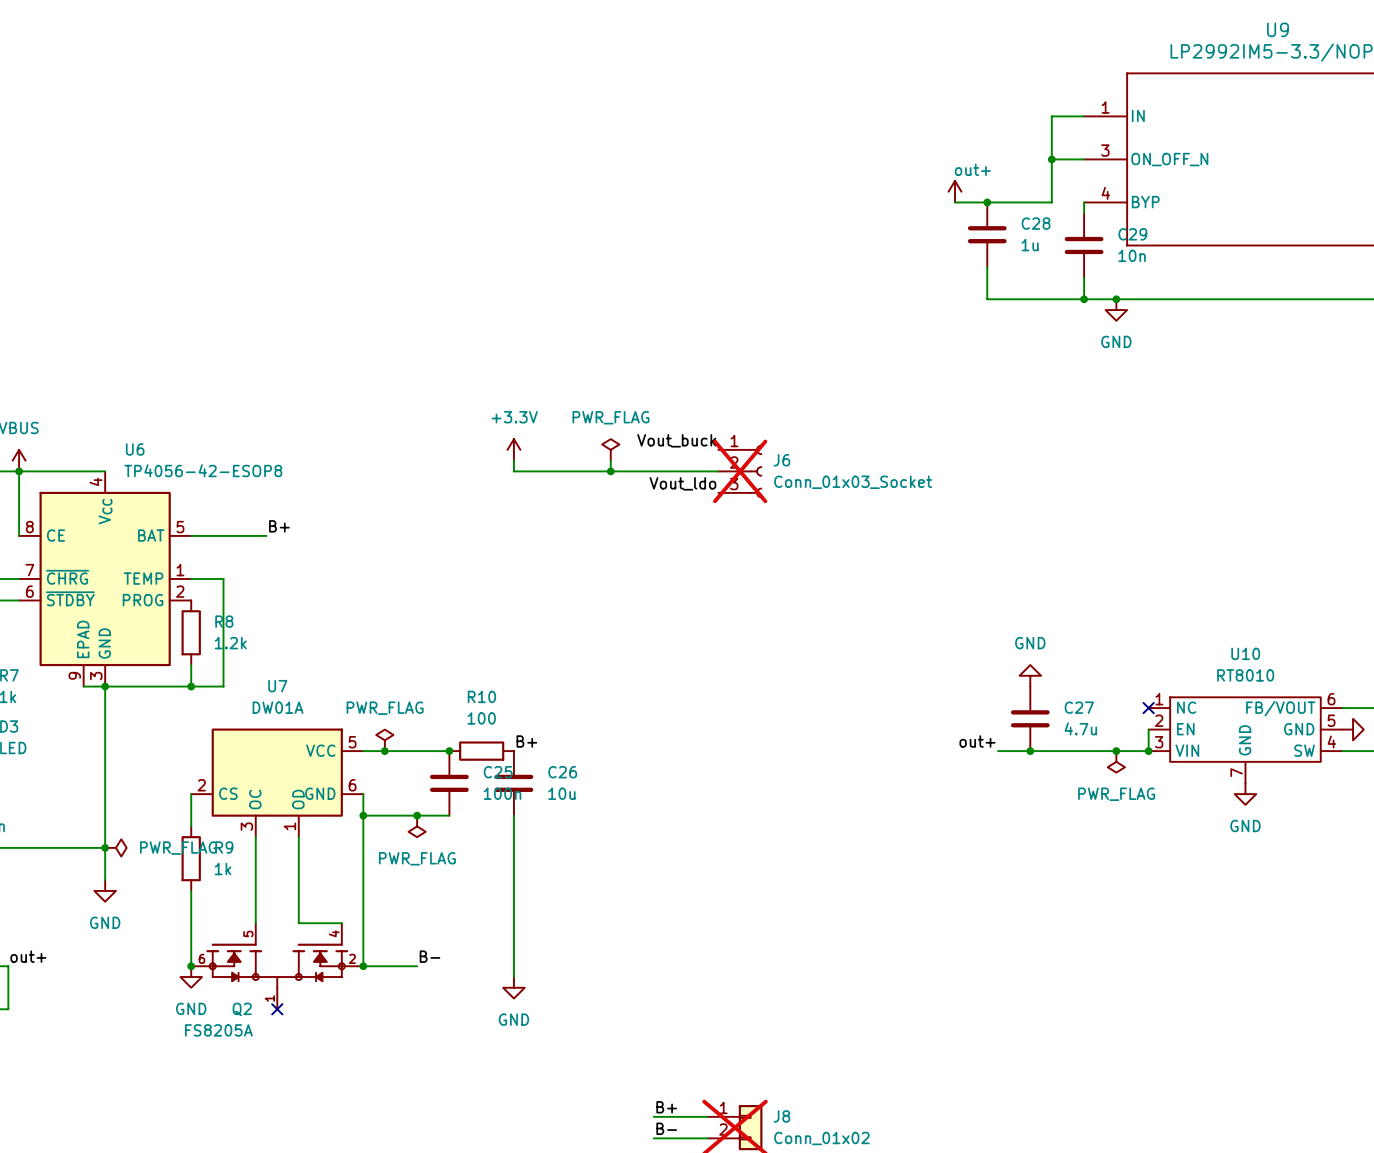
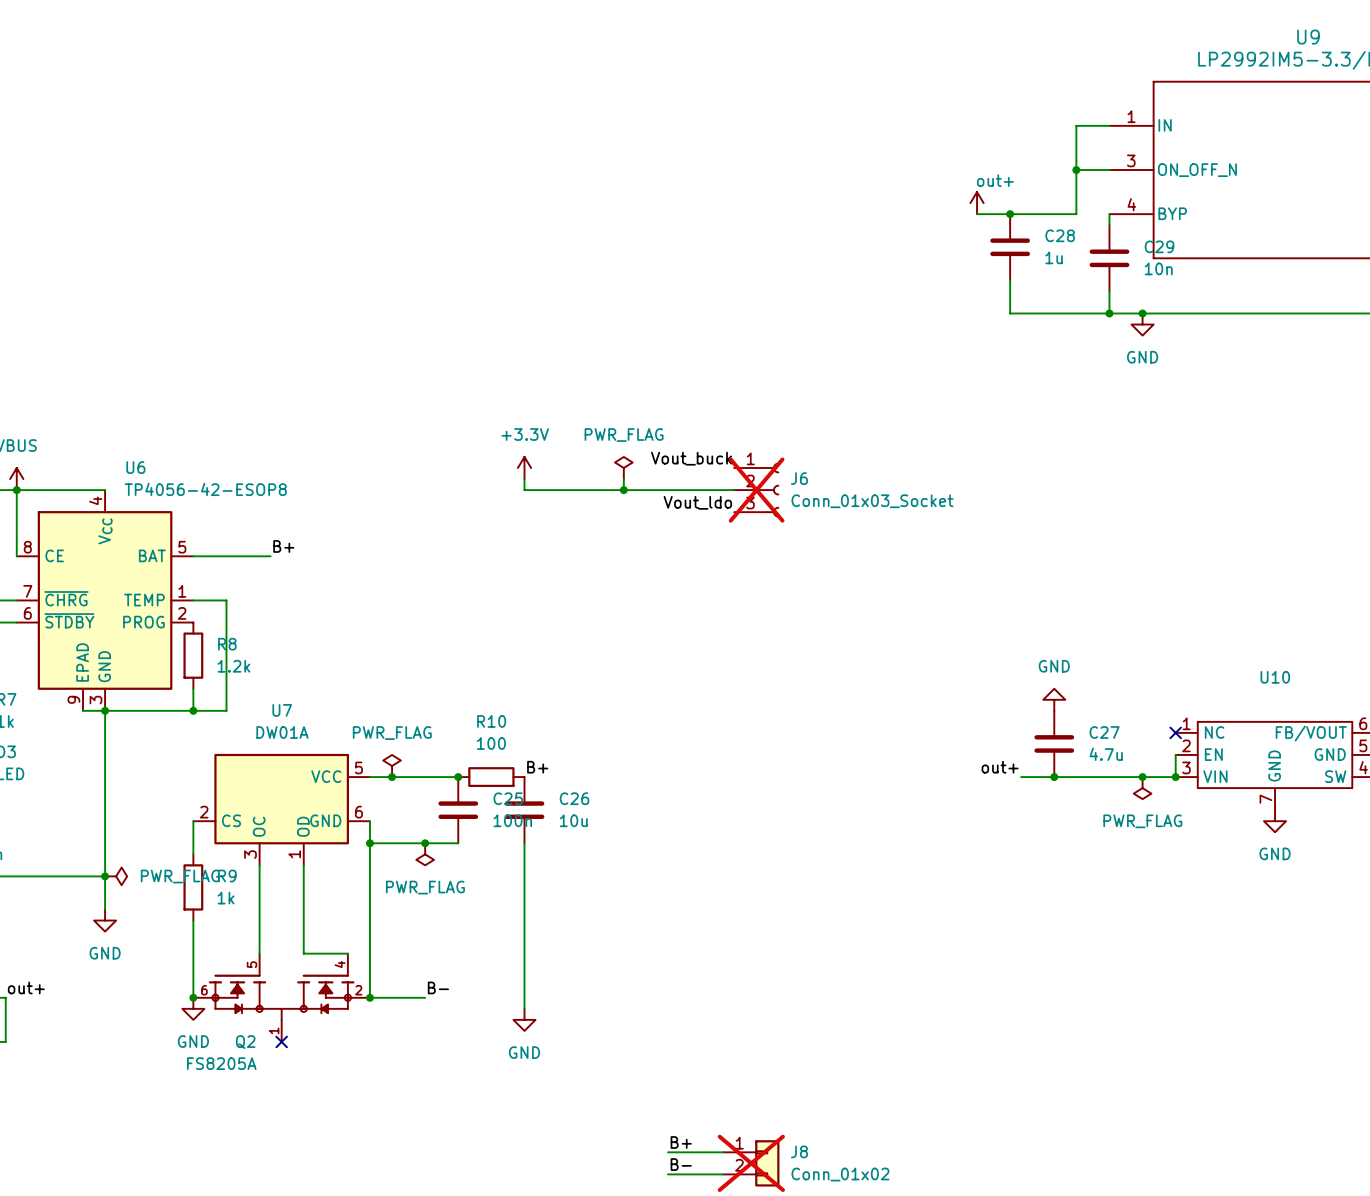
U10 value: RT8010 (1245, 675) -> none

